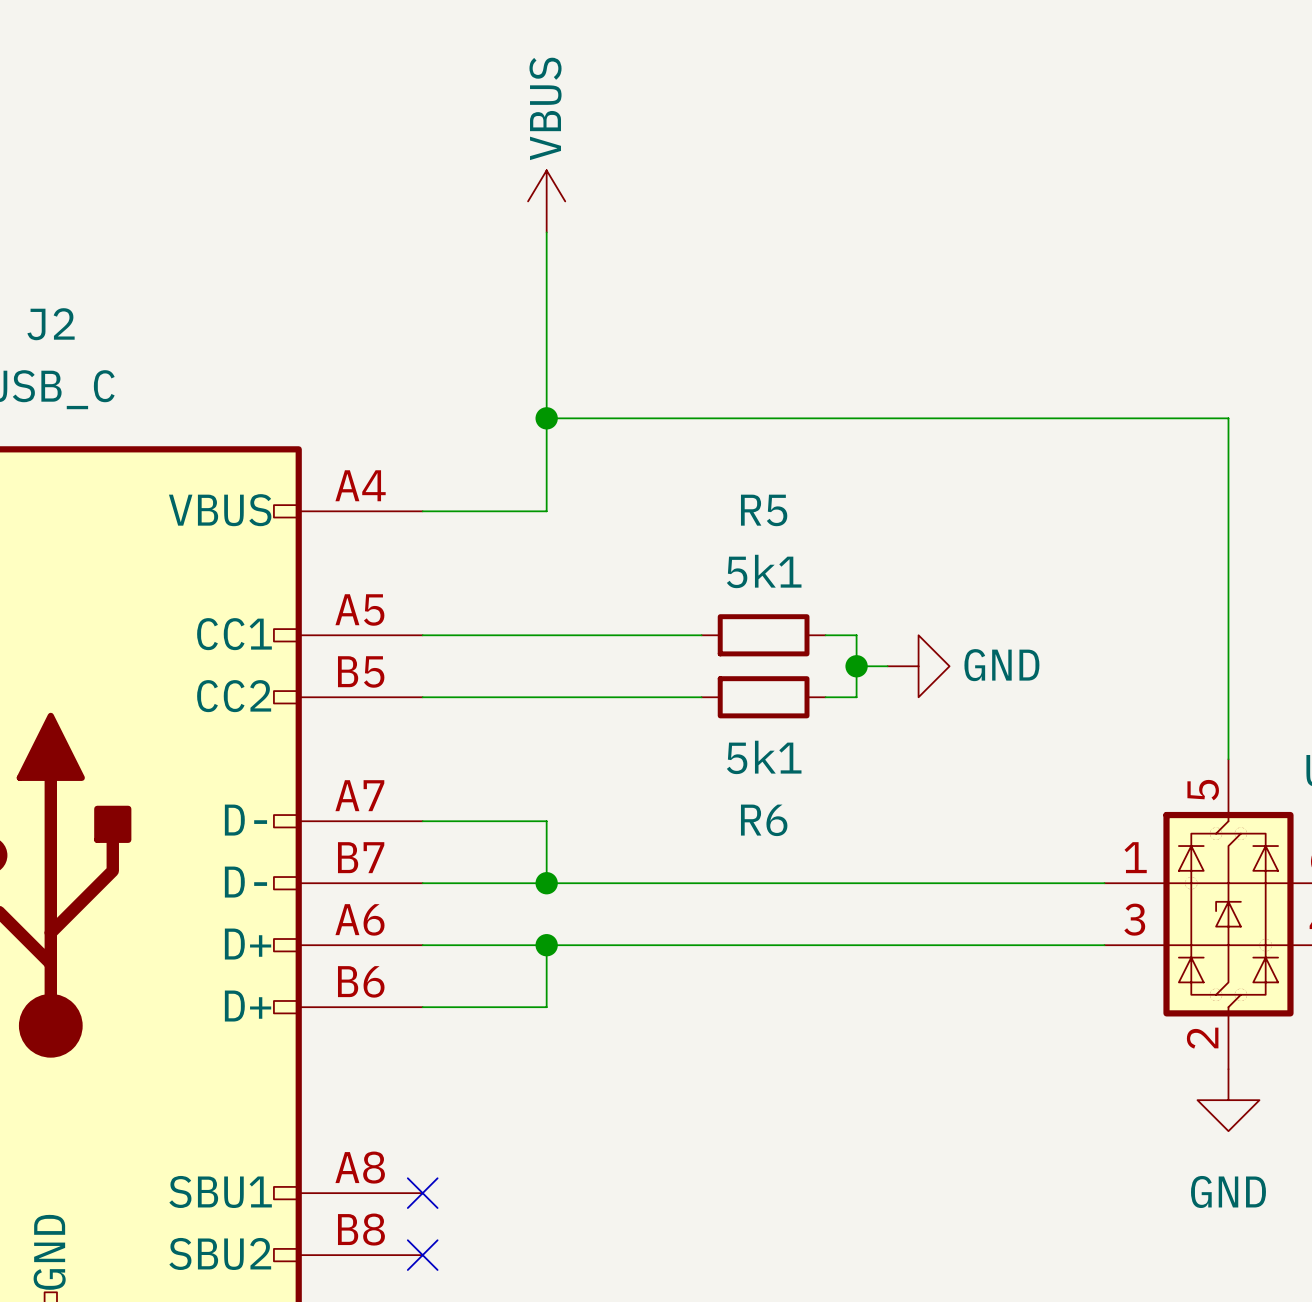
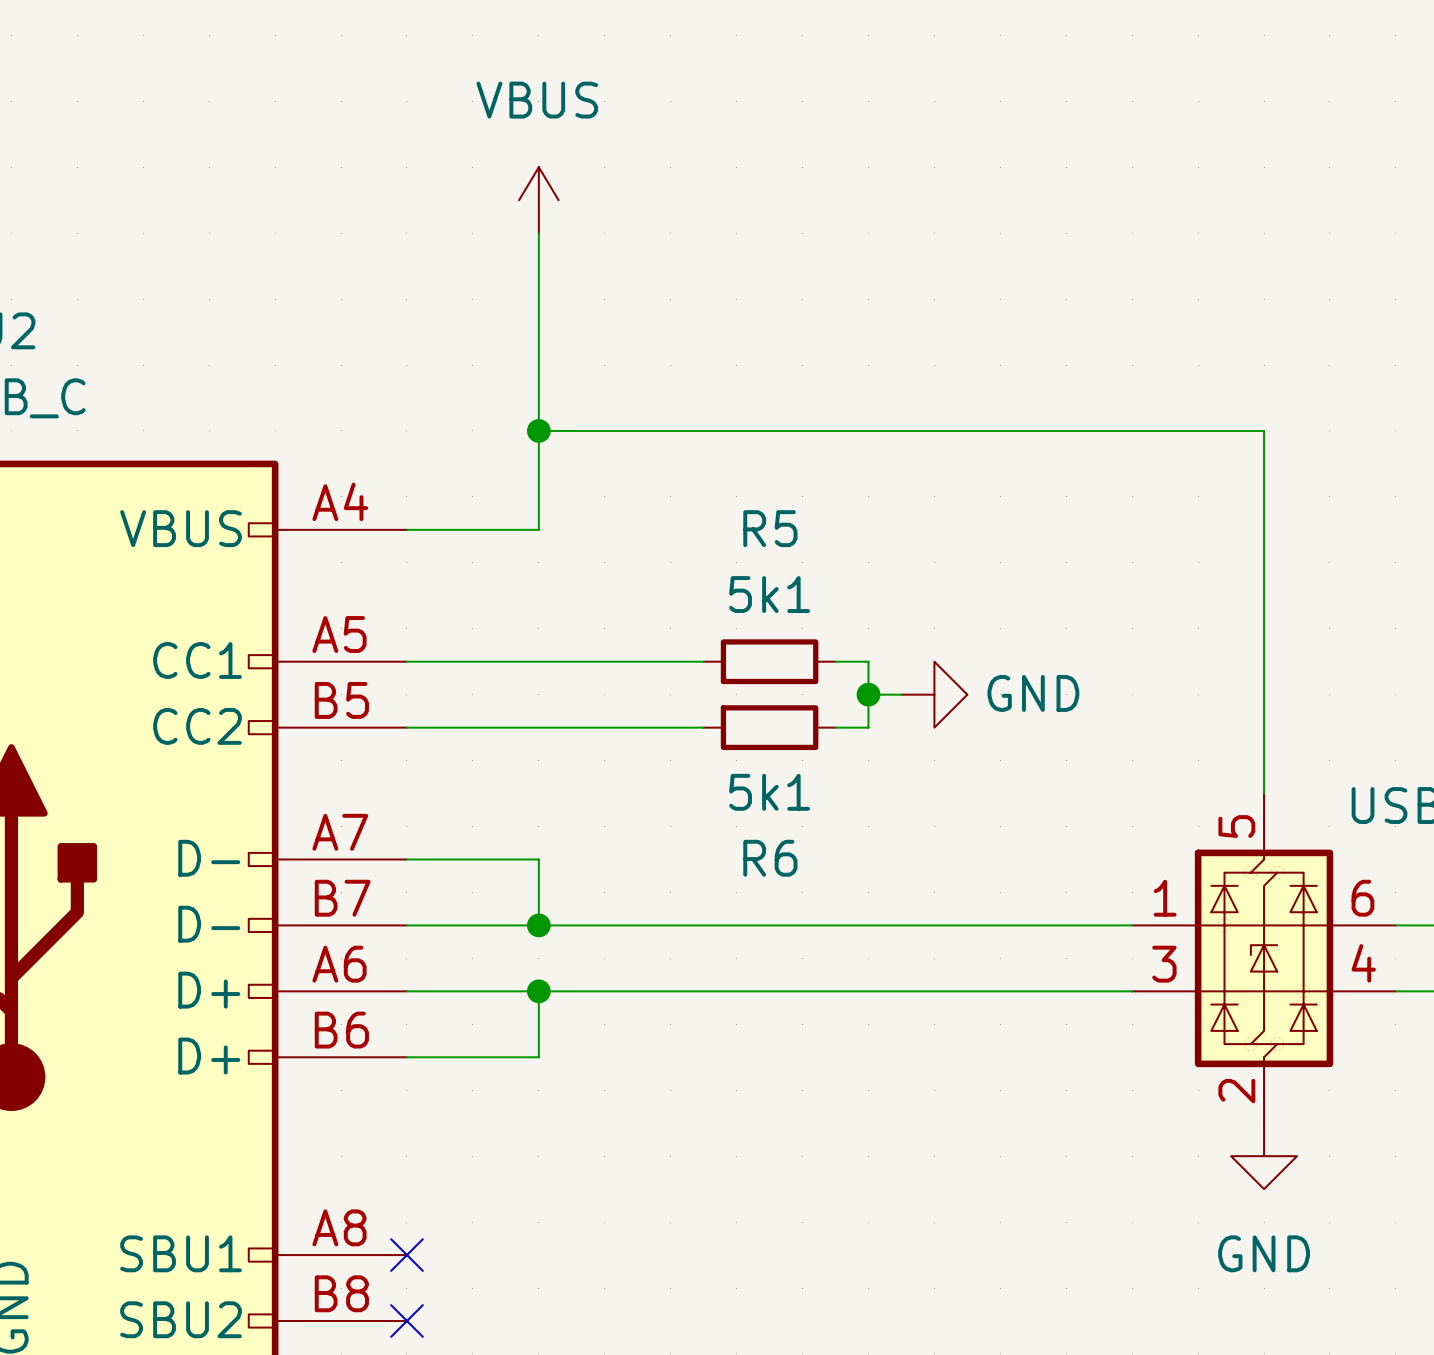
power symbol text rotation: 0° (545, 108) -> 90° clockwise (537, 100)

